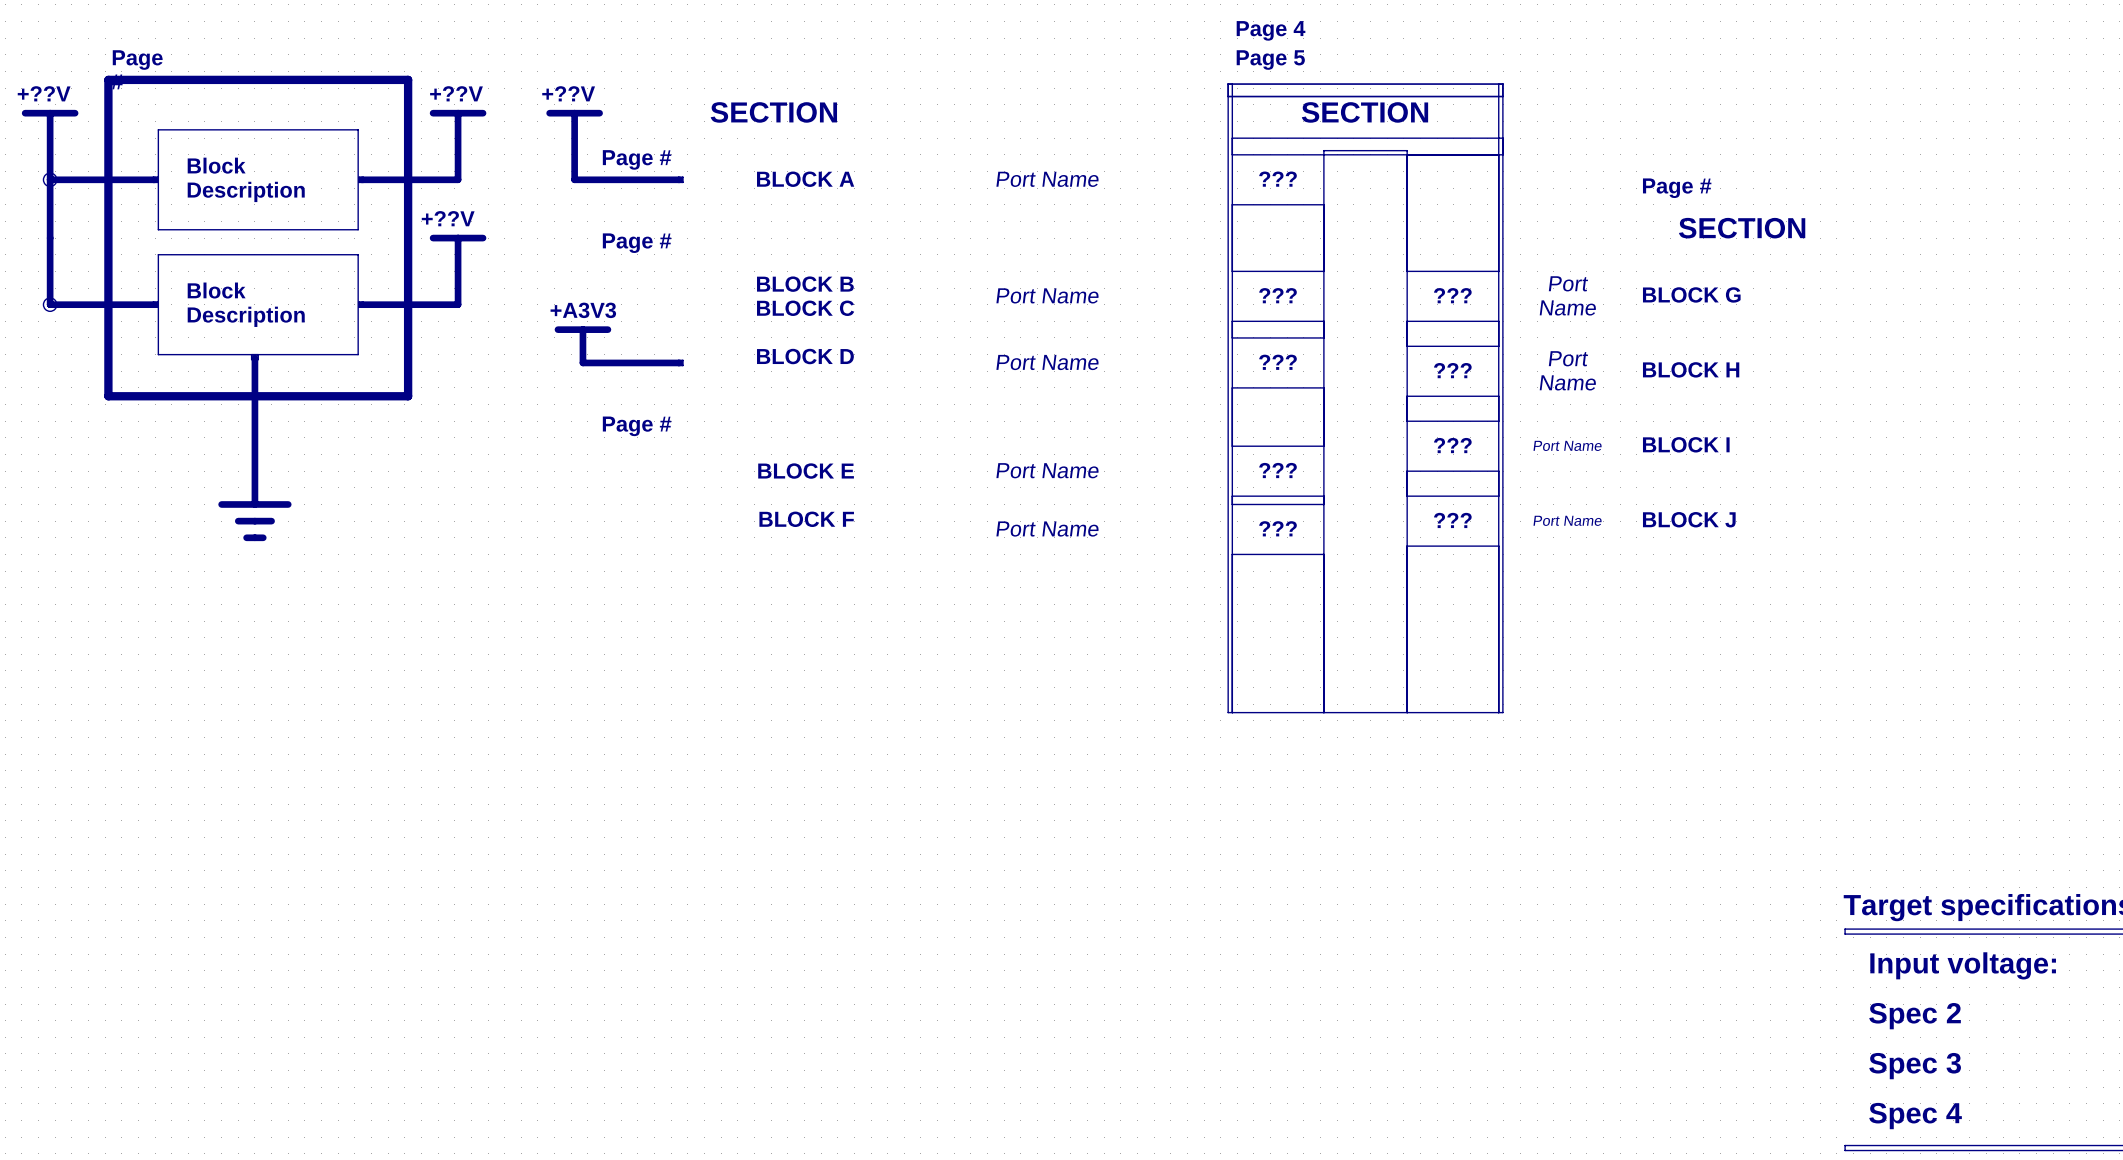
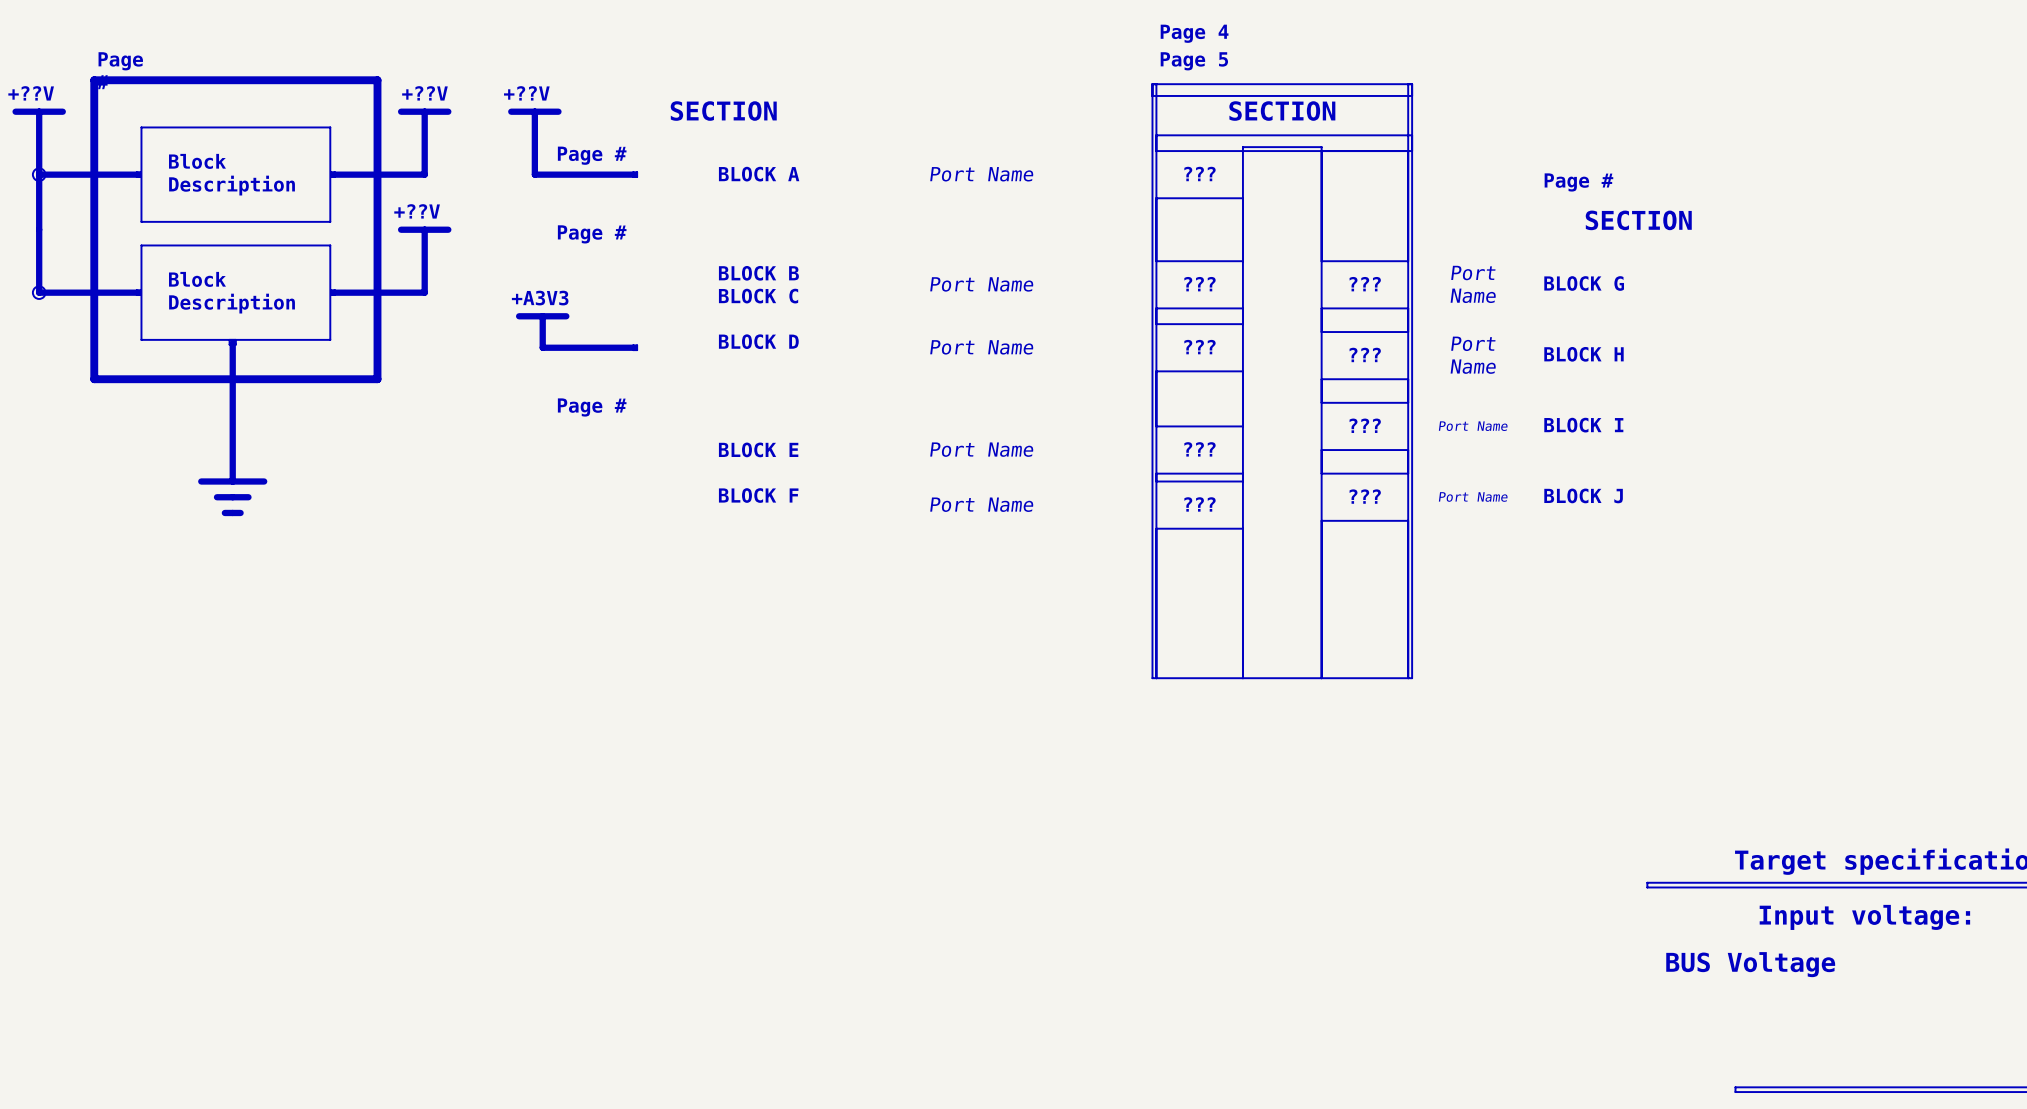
line: (1845, 929) (1845, 934) -> (1735, 882) (1647, 882) (1647, 887) (1735, 887)
text: none -> BUS Voltage (1750, 964)
text: Spec 2 (1915, 1016) -> none
text: Spec 3 (1915, 1066) -> none
text: Spec 4 (1915, 1116) -> none

